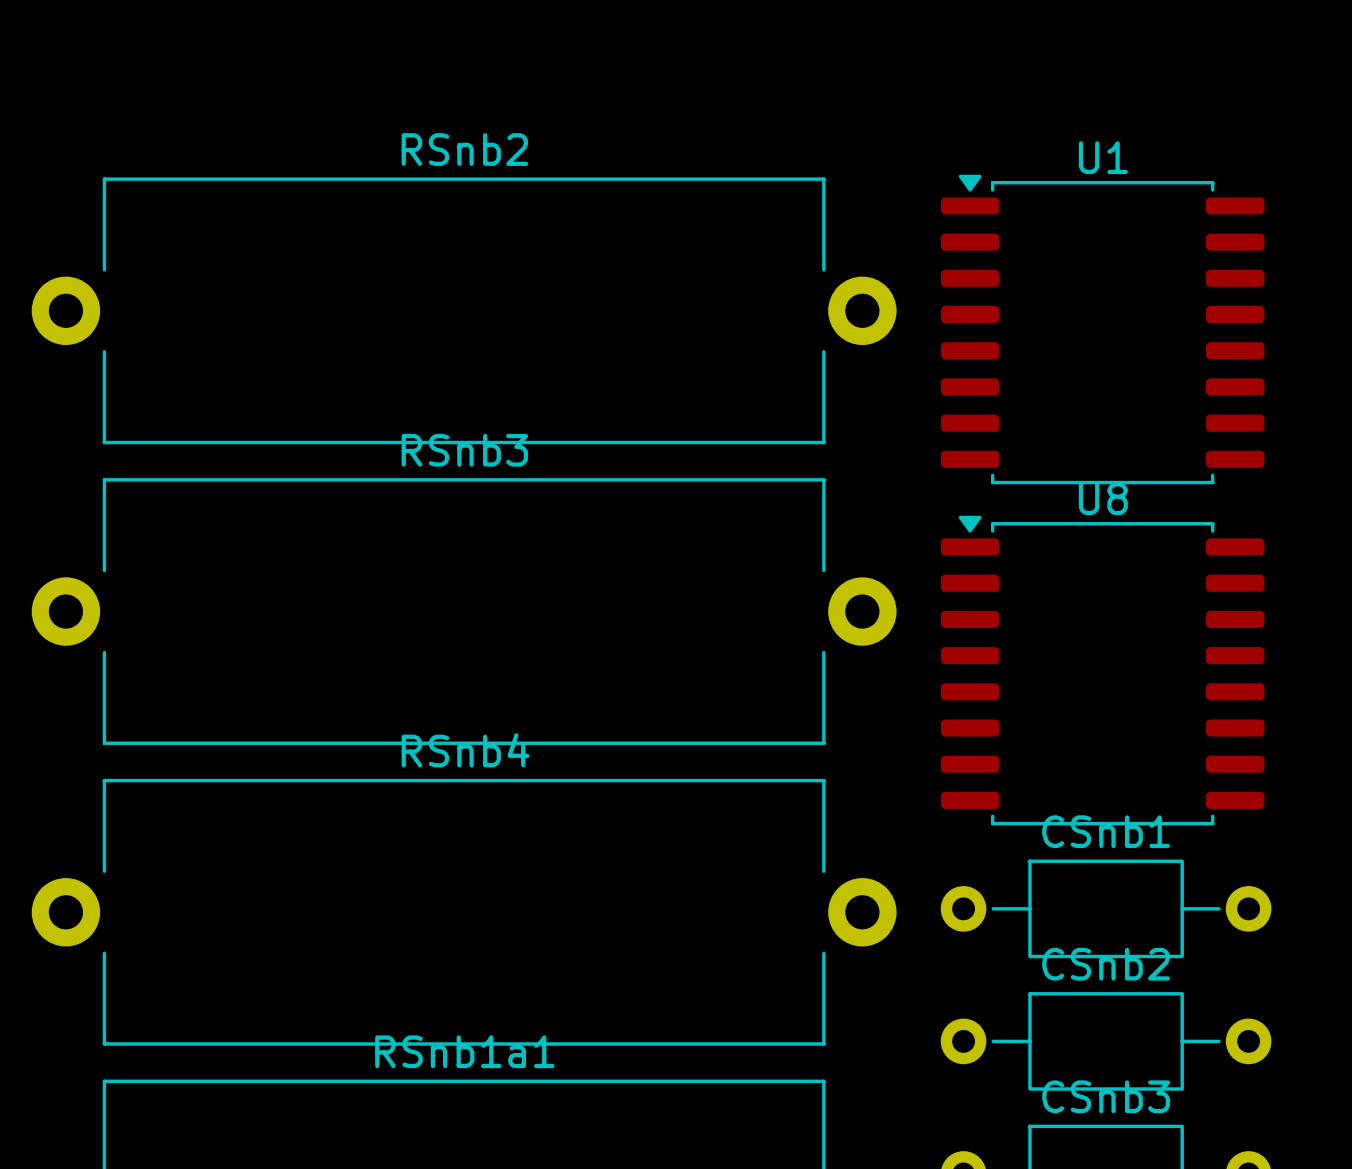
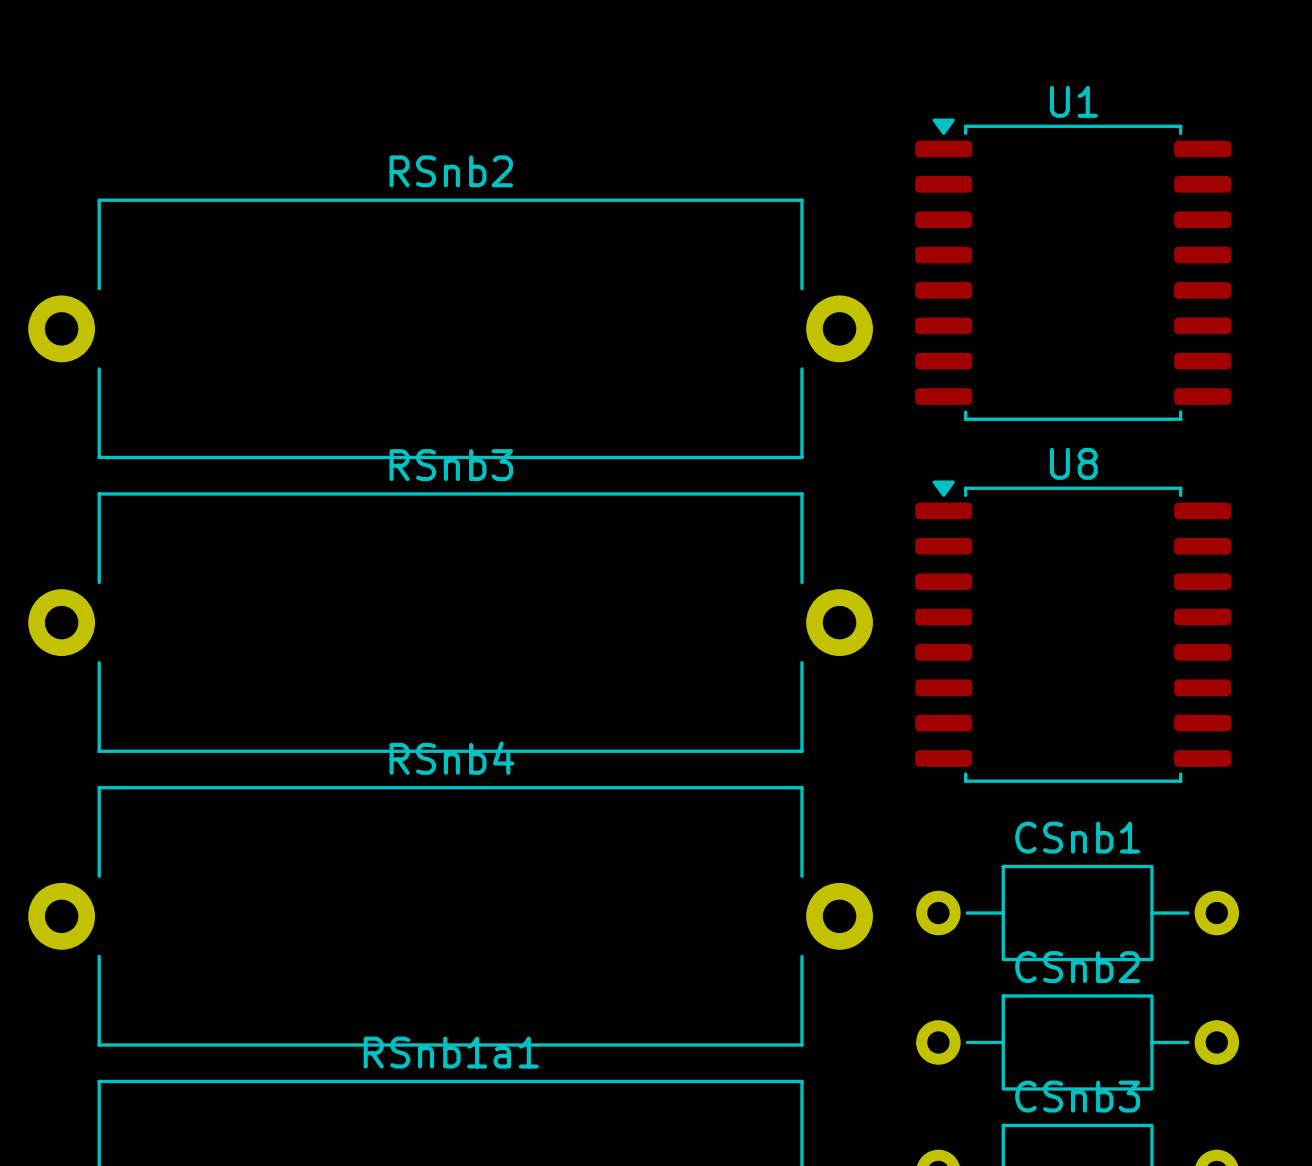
U1 position: (1102, 329) -> (1073, 269)
U8 position: (1102, 670) -> (1073, 631)

